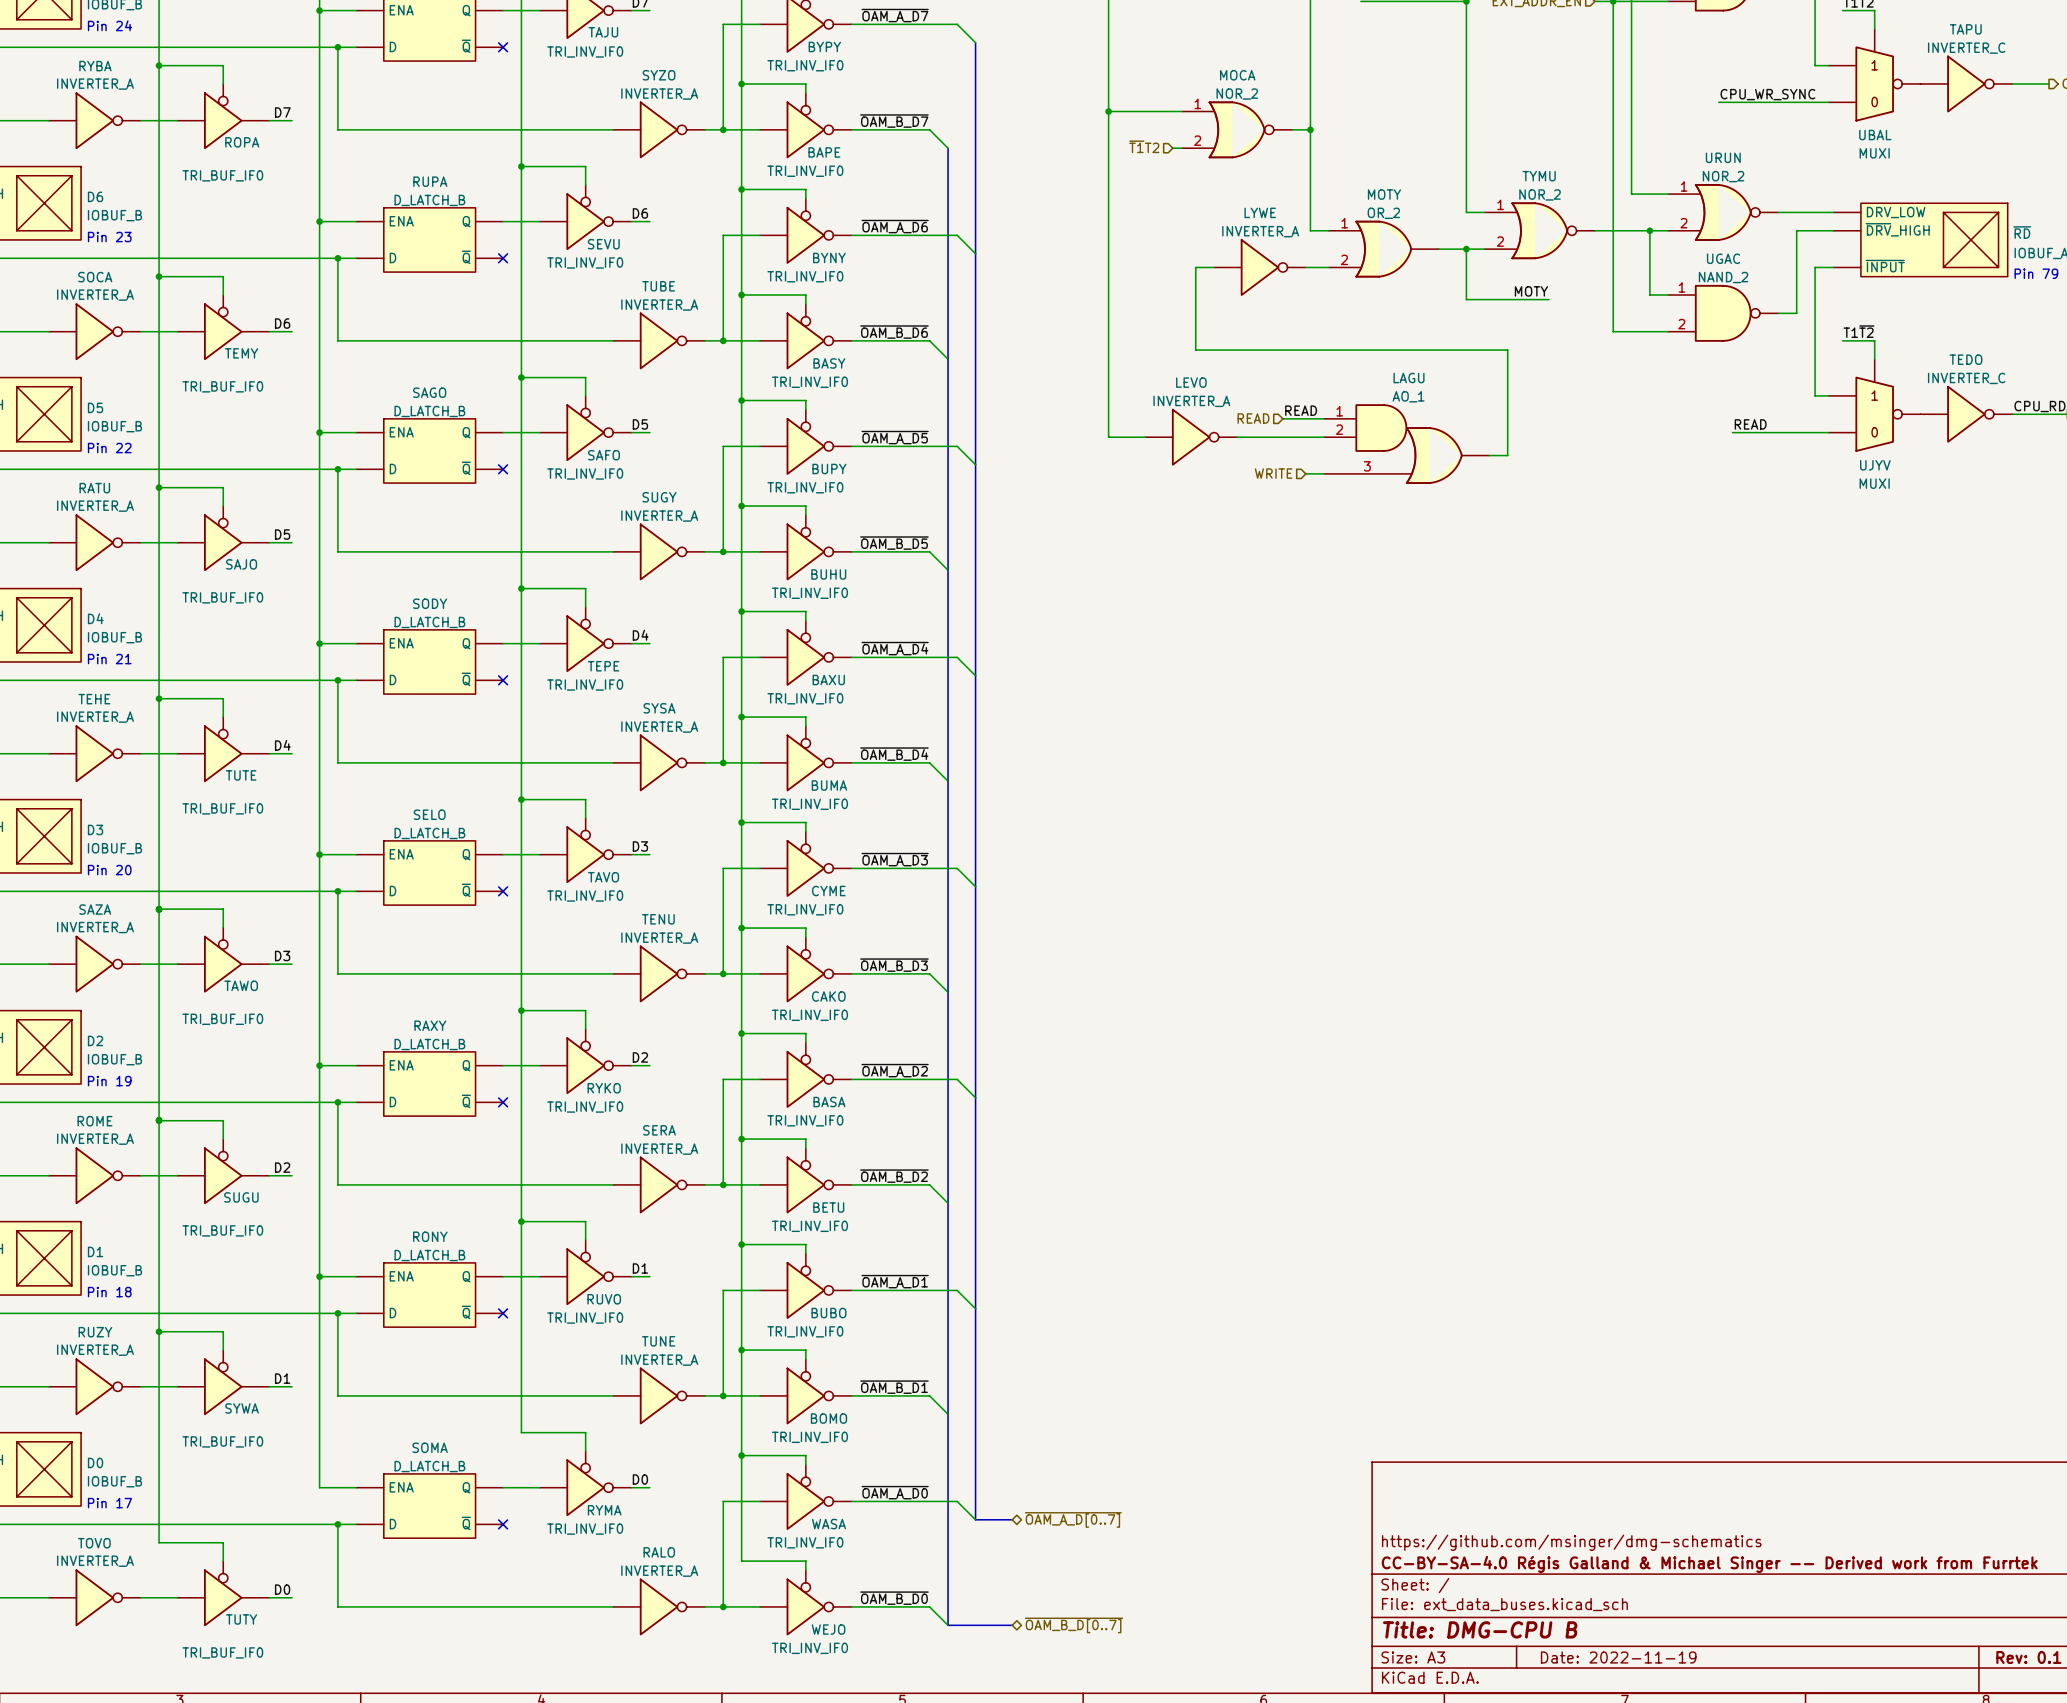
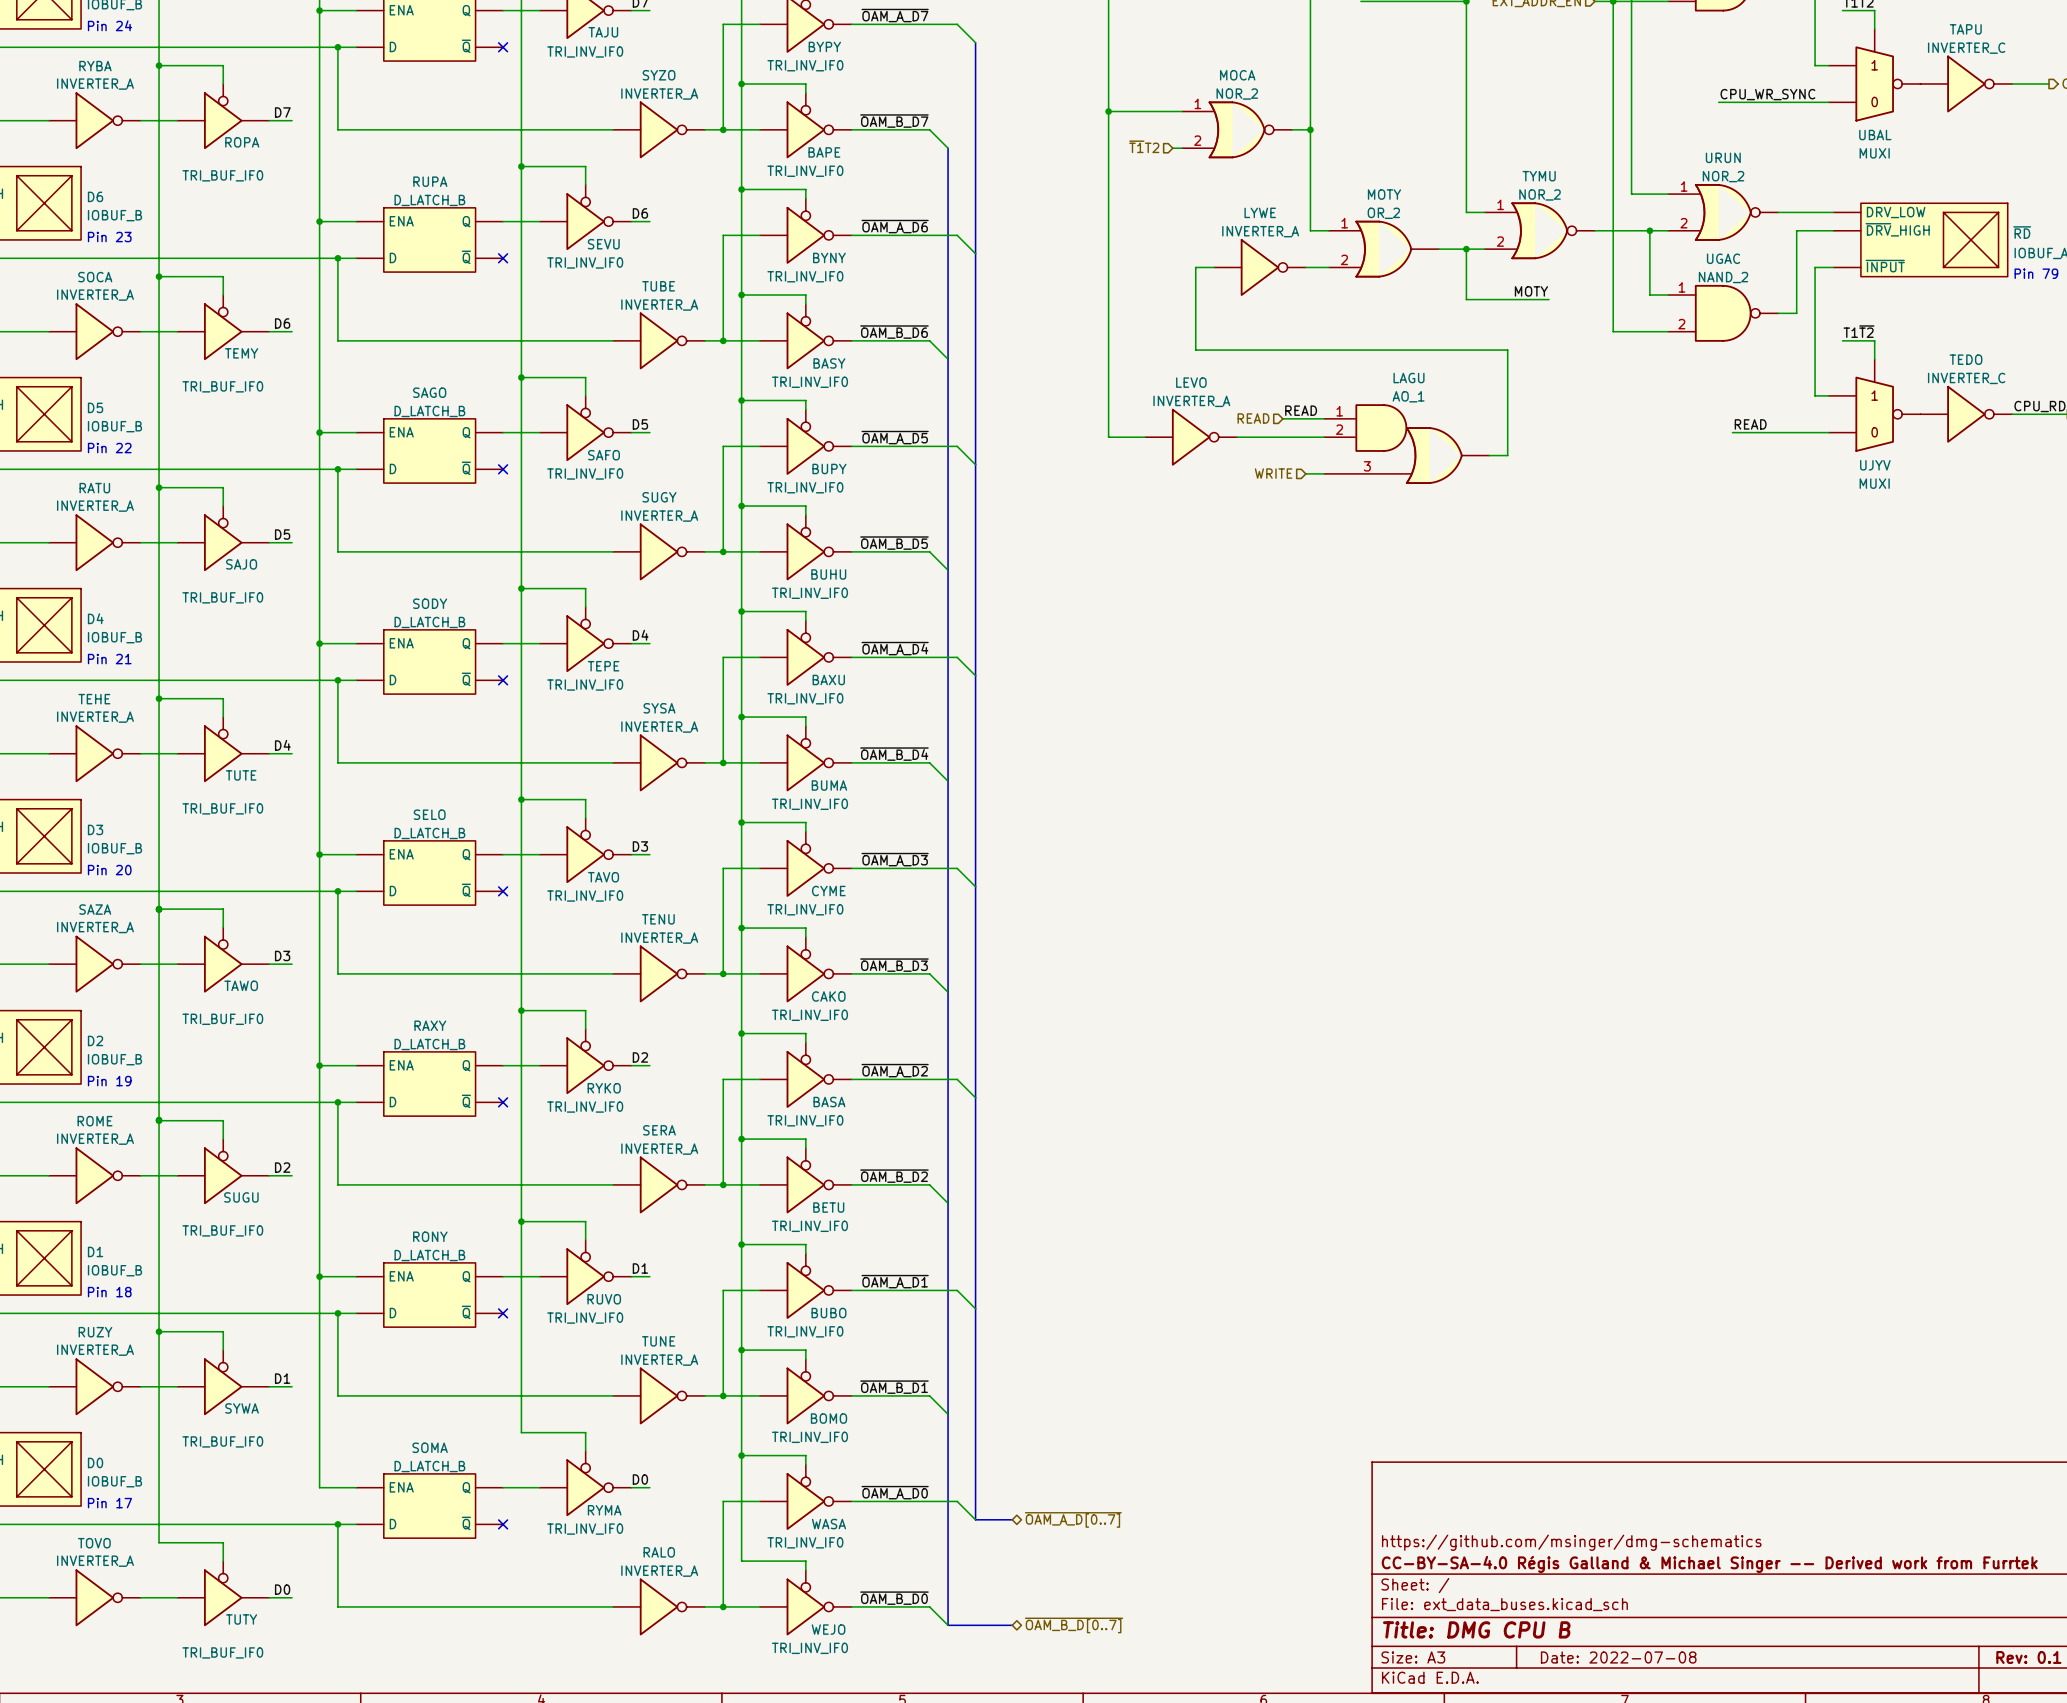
title block: Title: DMG-CPU B (1480, 1629) -> Title: DMG CPU B (1476, 1629)
title block: Date: 2022-11-19 (1618, 1657) -> Date: 2022-07-08 (1618, 1657)

